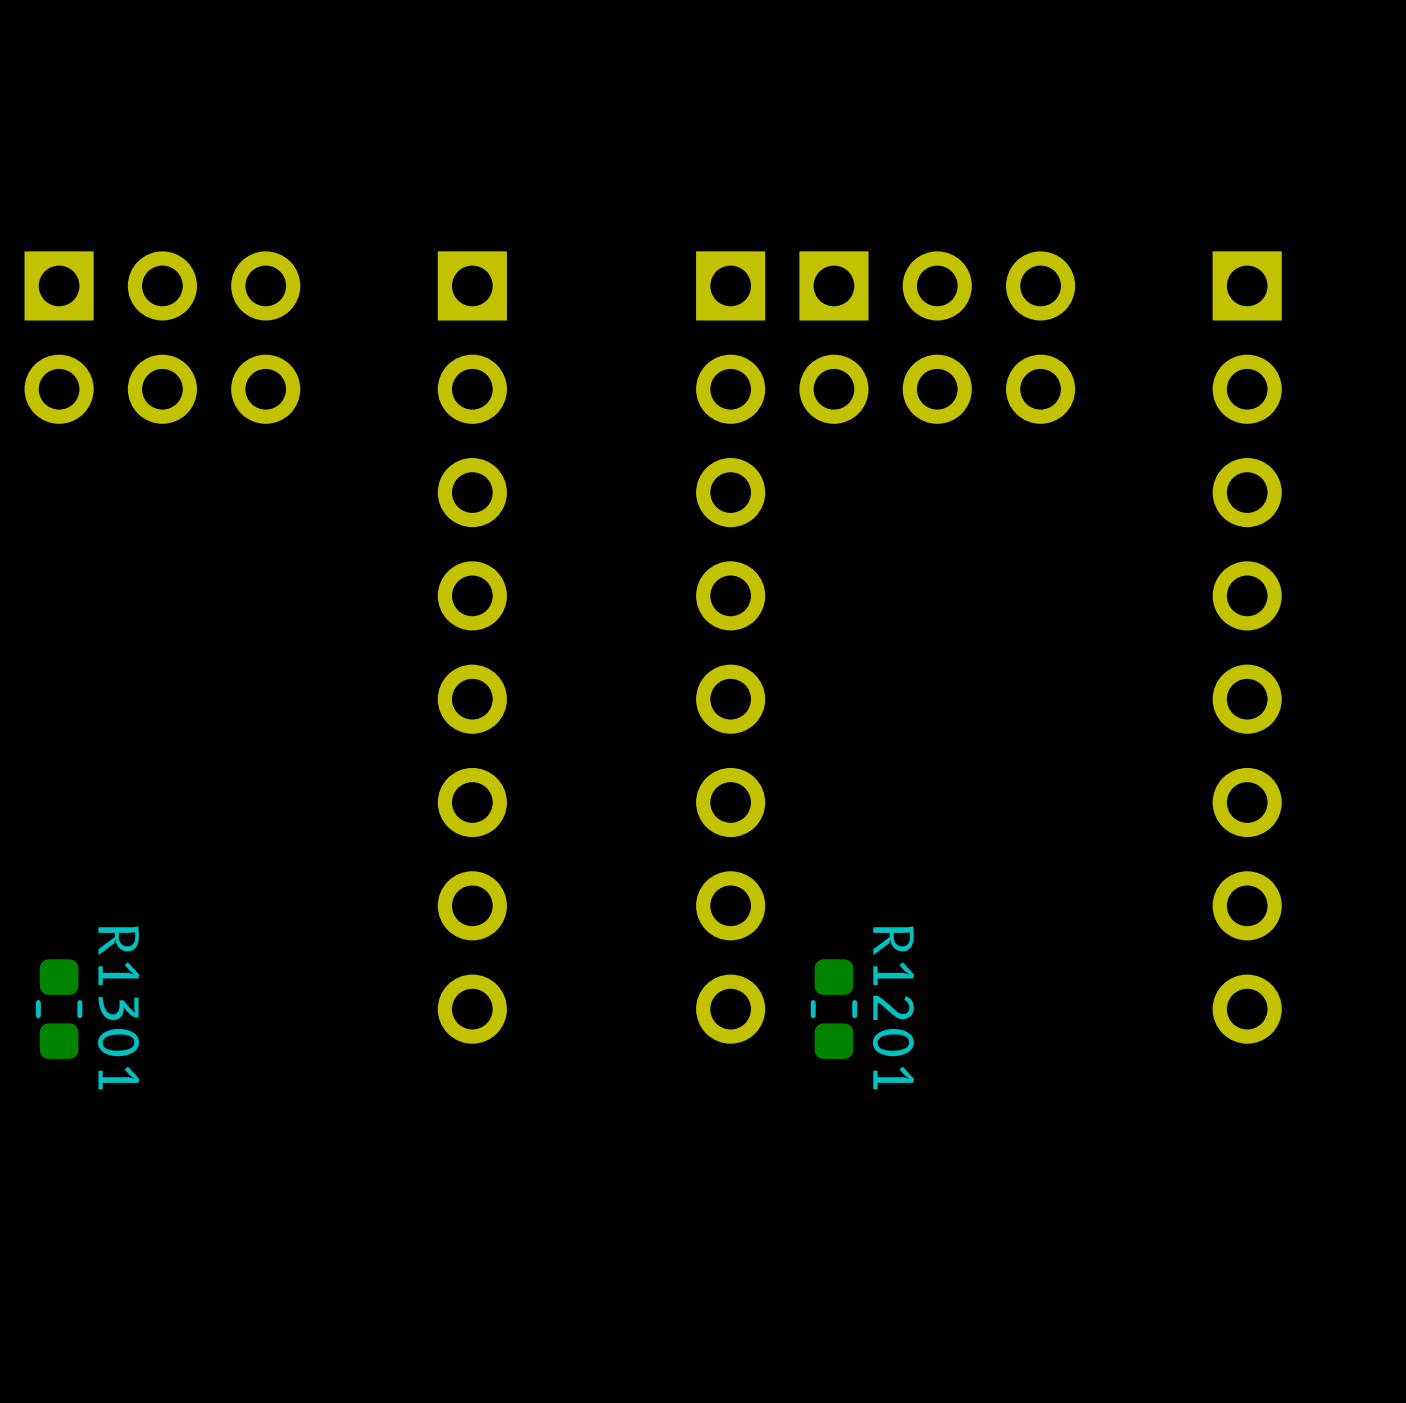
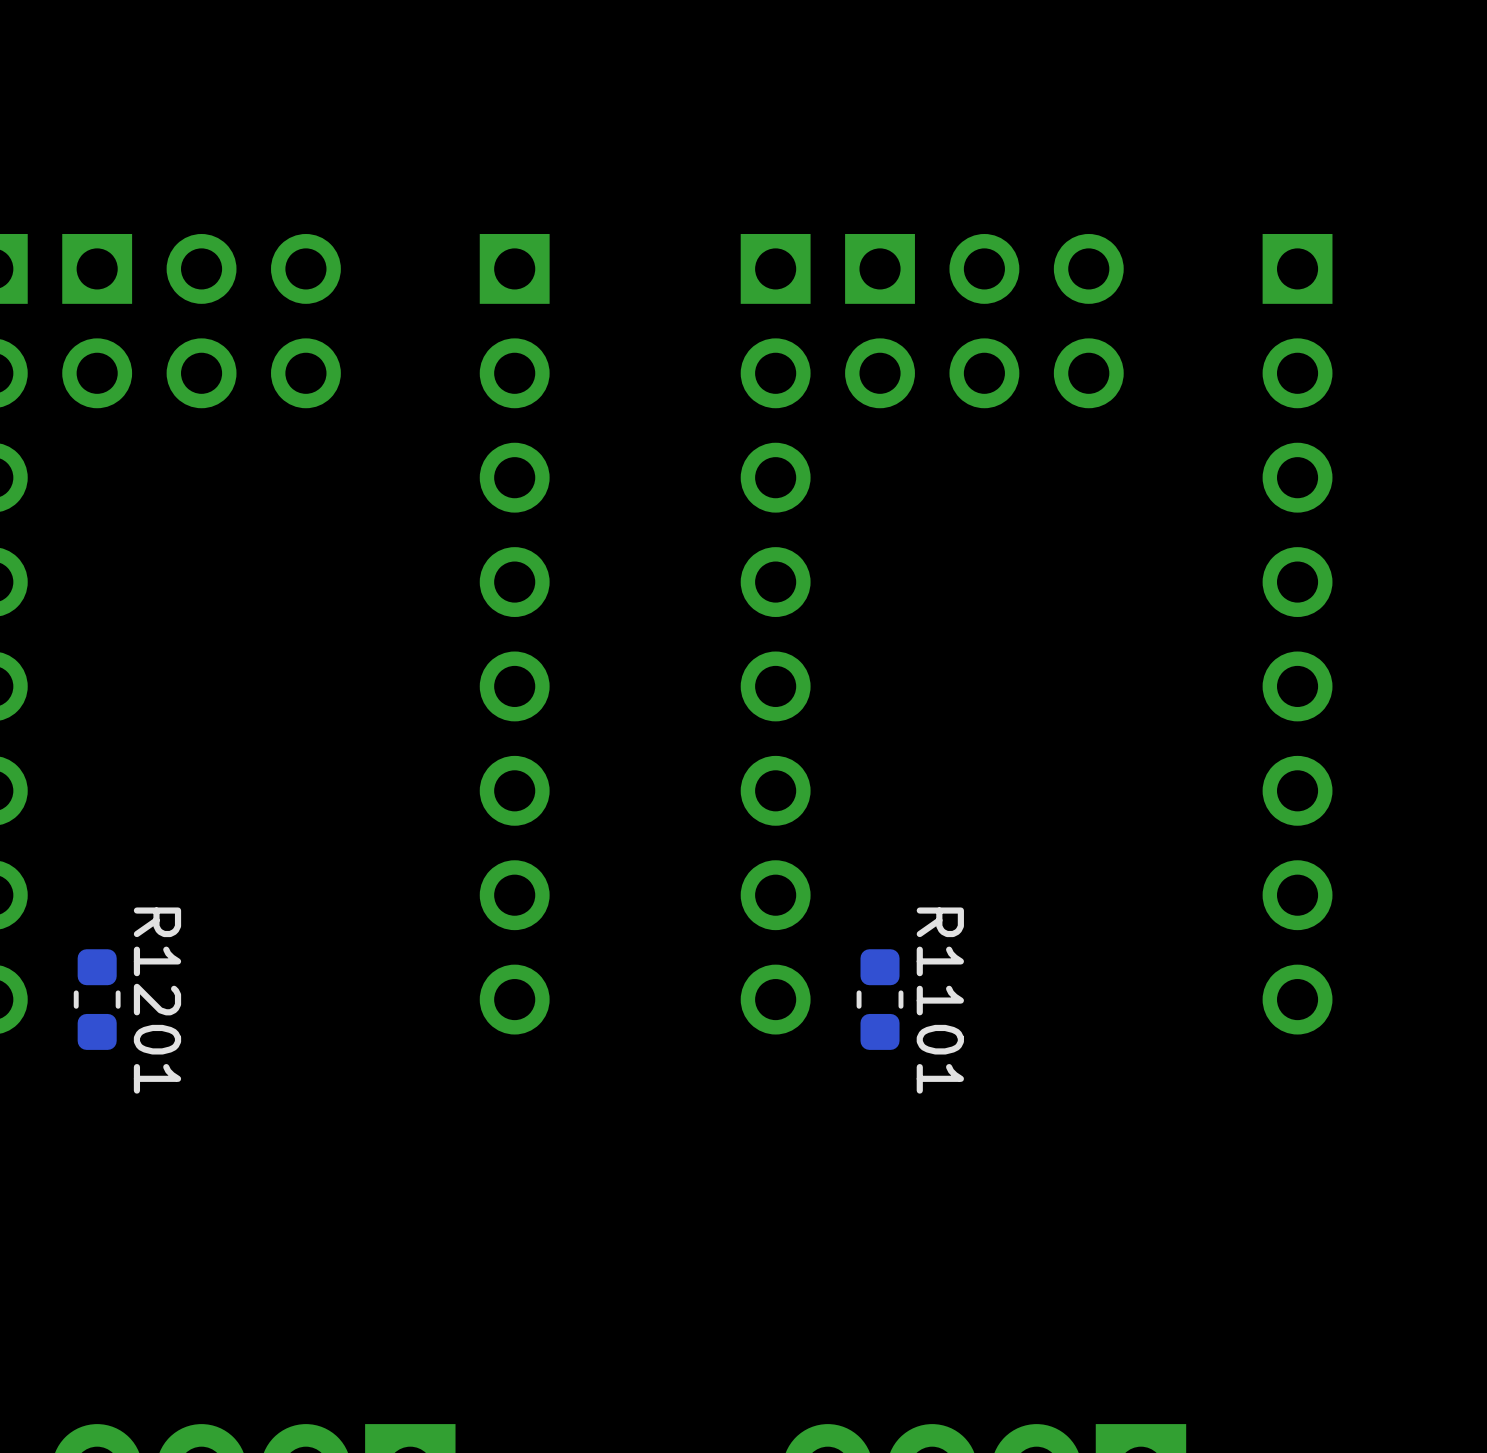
R1301 name: R1301 (118, 1007) -> R1201 (157, 1000)
R1201 name: R1201 (893, 1007) -> R1101 (940, 1000)

